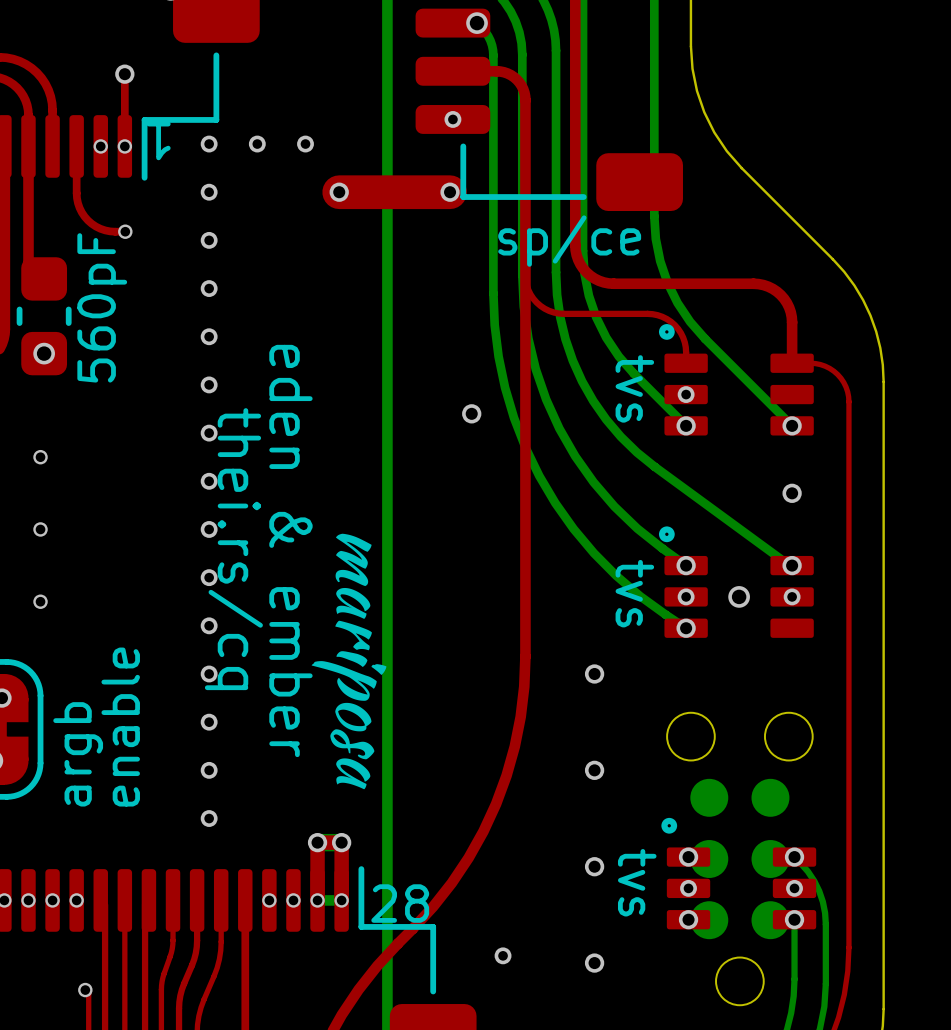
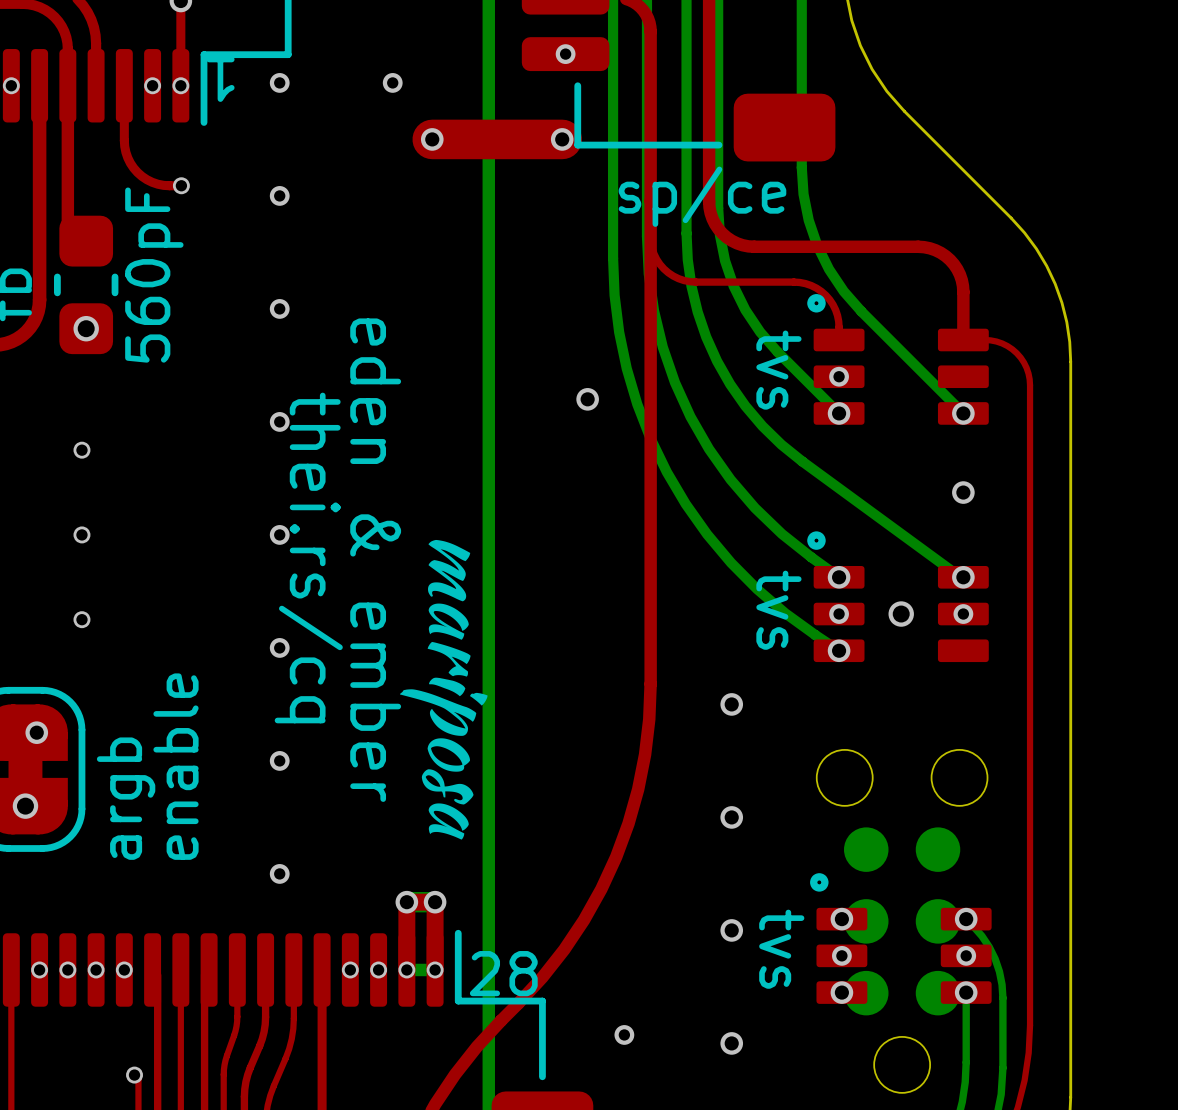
via: (257, 144) -> none
via: (209, 192) -> none
via: (209, 288) -> none
via: (209, 384) -> none
via: (209, 481) -> none
via: (209, 577) -> none
via: (209, 674) -> none
via: (209, 770) -> none

